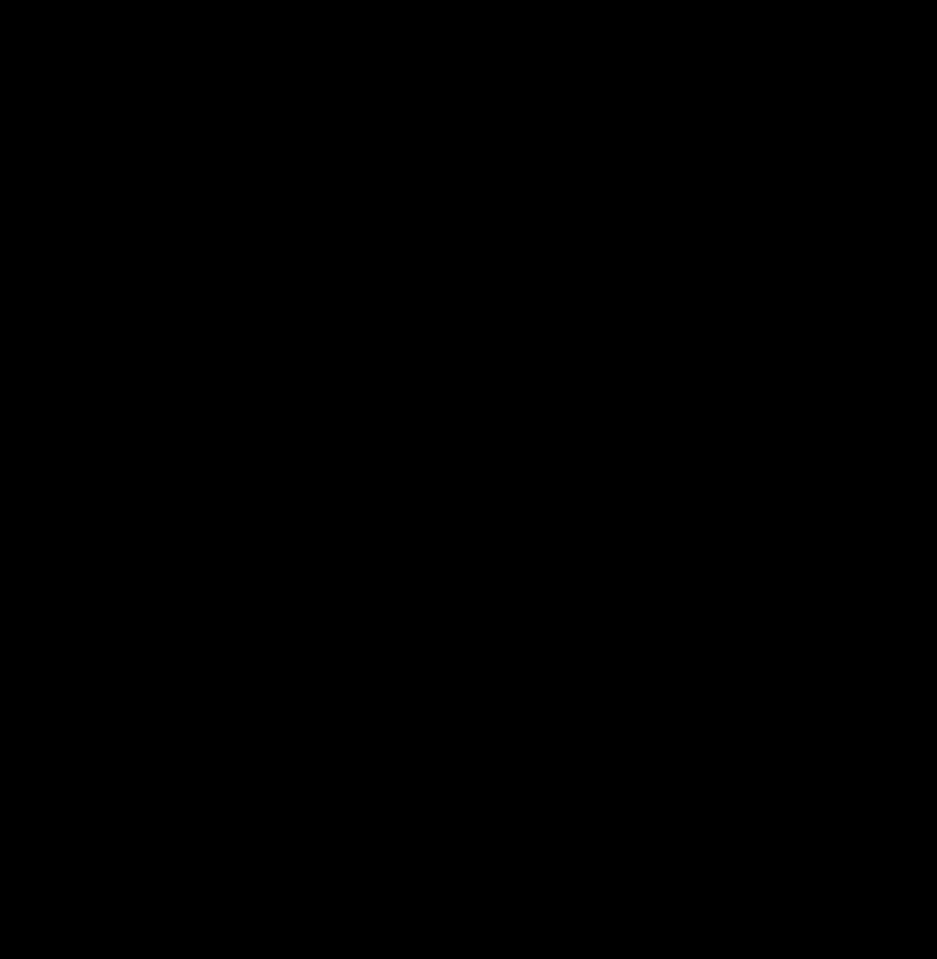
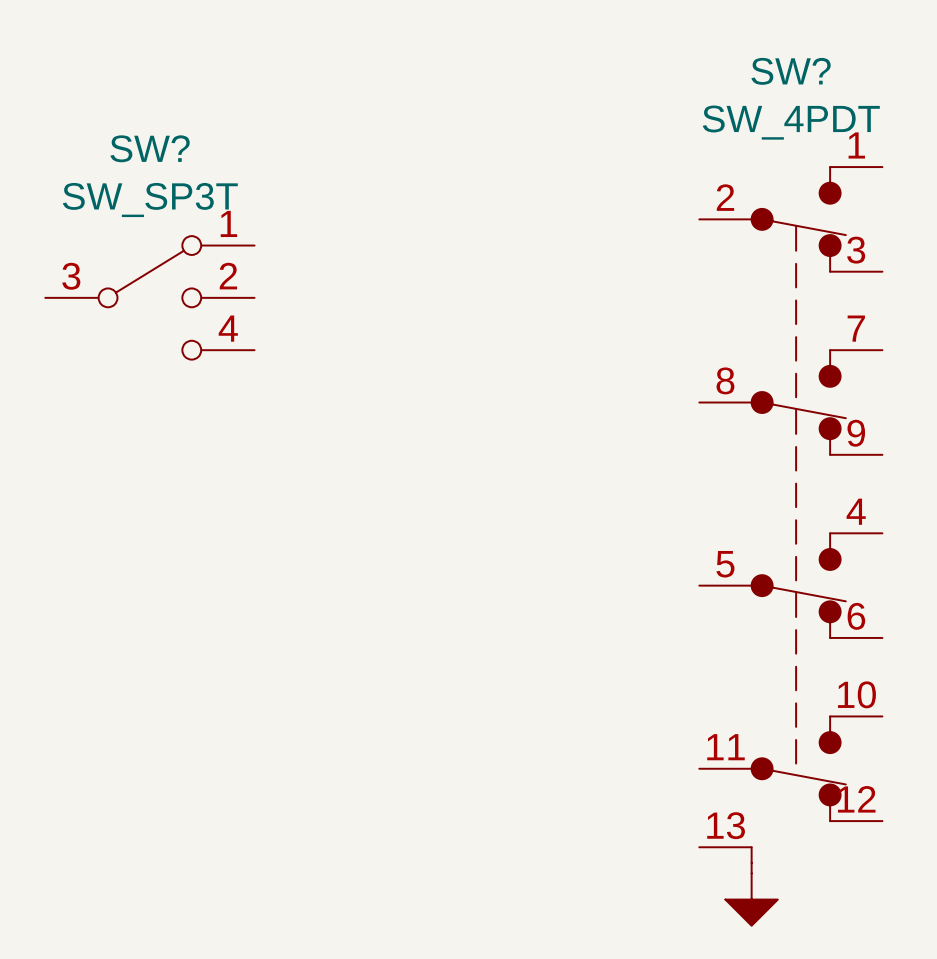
SW?: none -> SW_SP3T (149, 297)
SW?: none -> SW_4PDT (790, 546)

